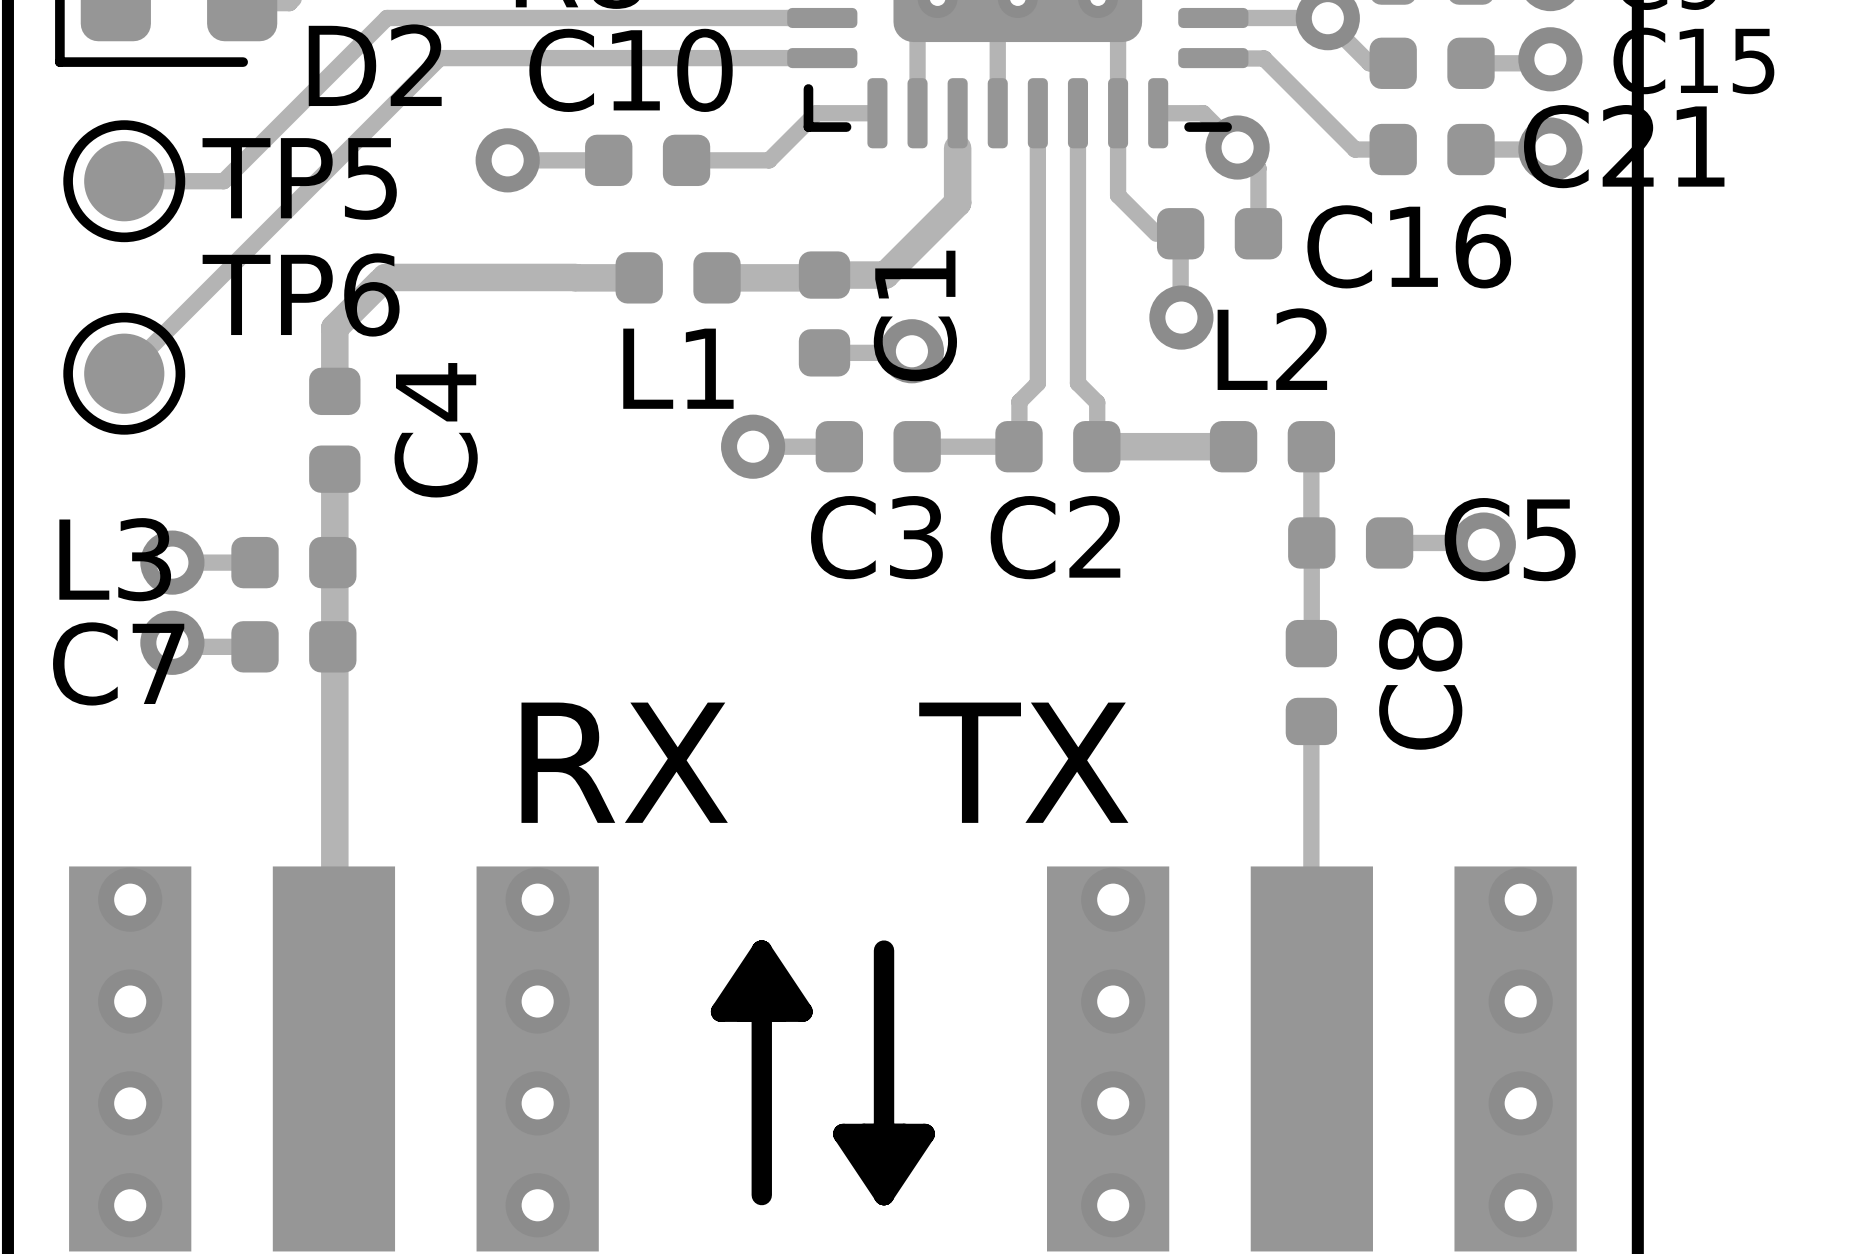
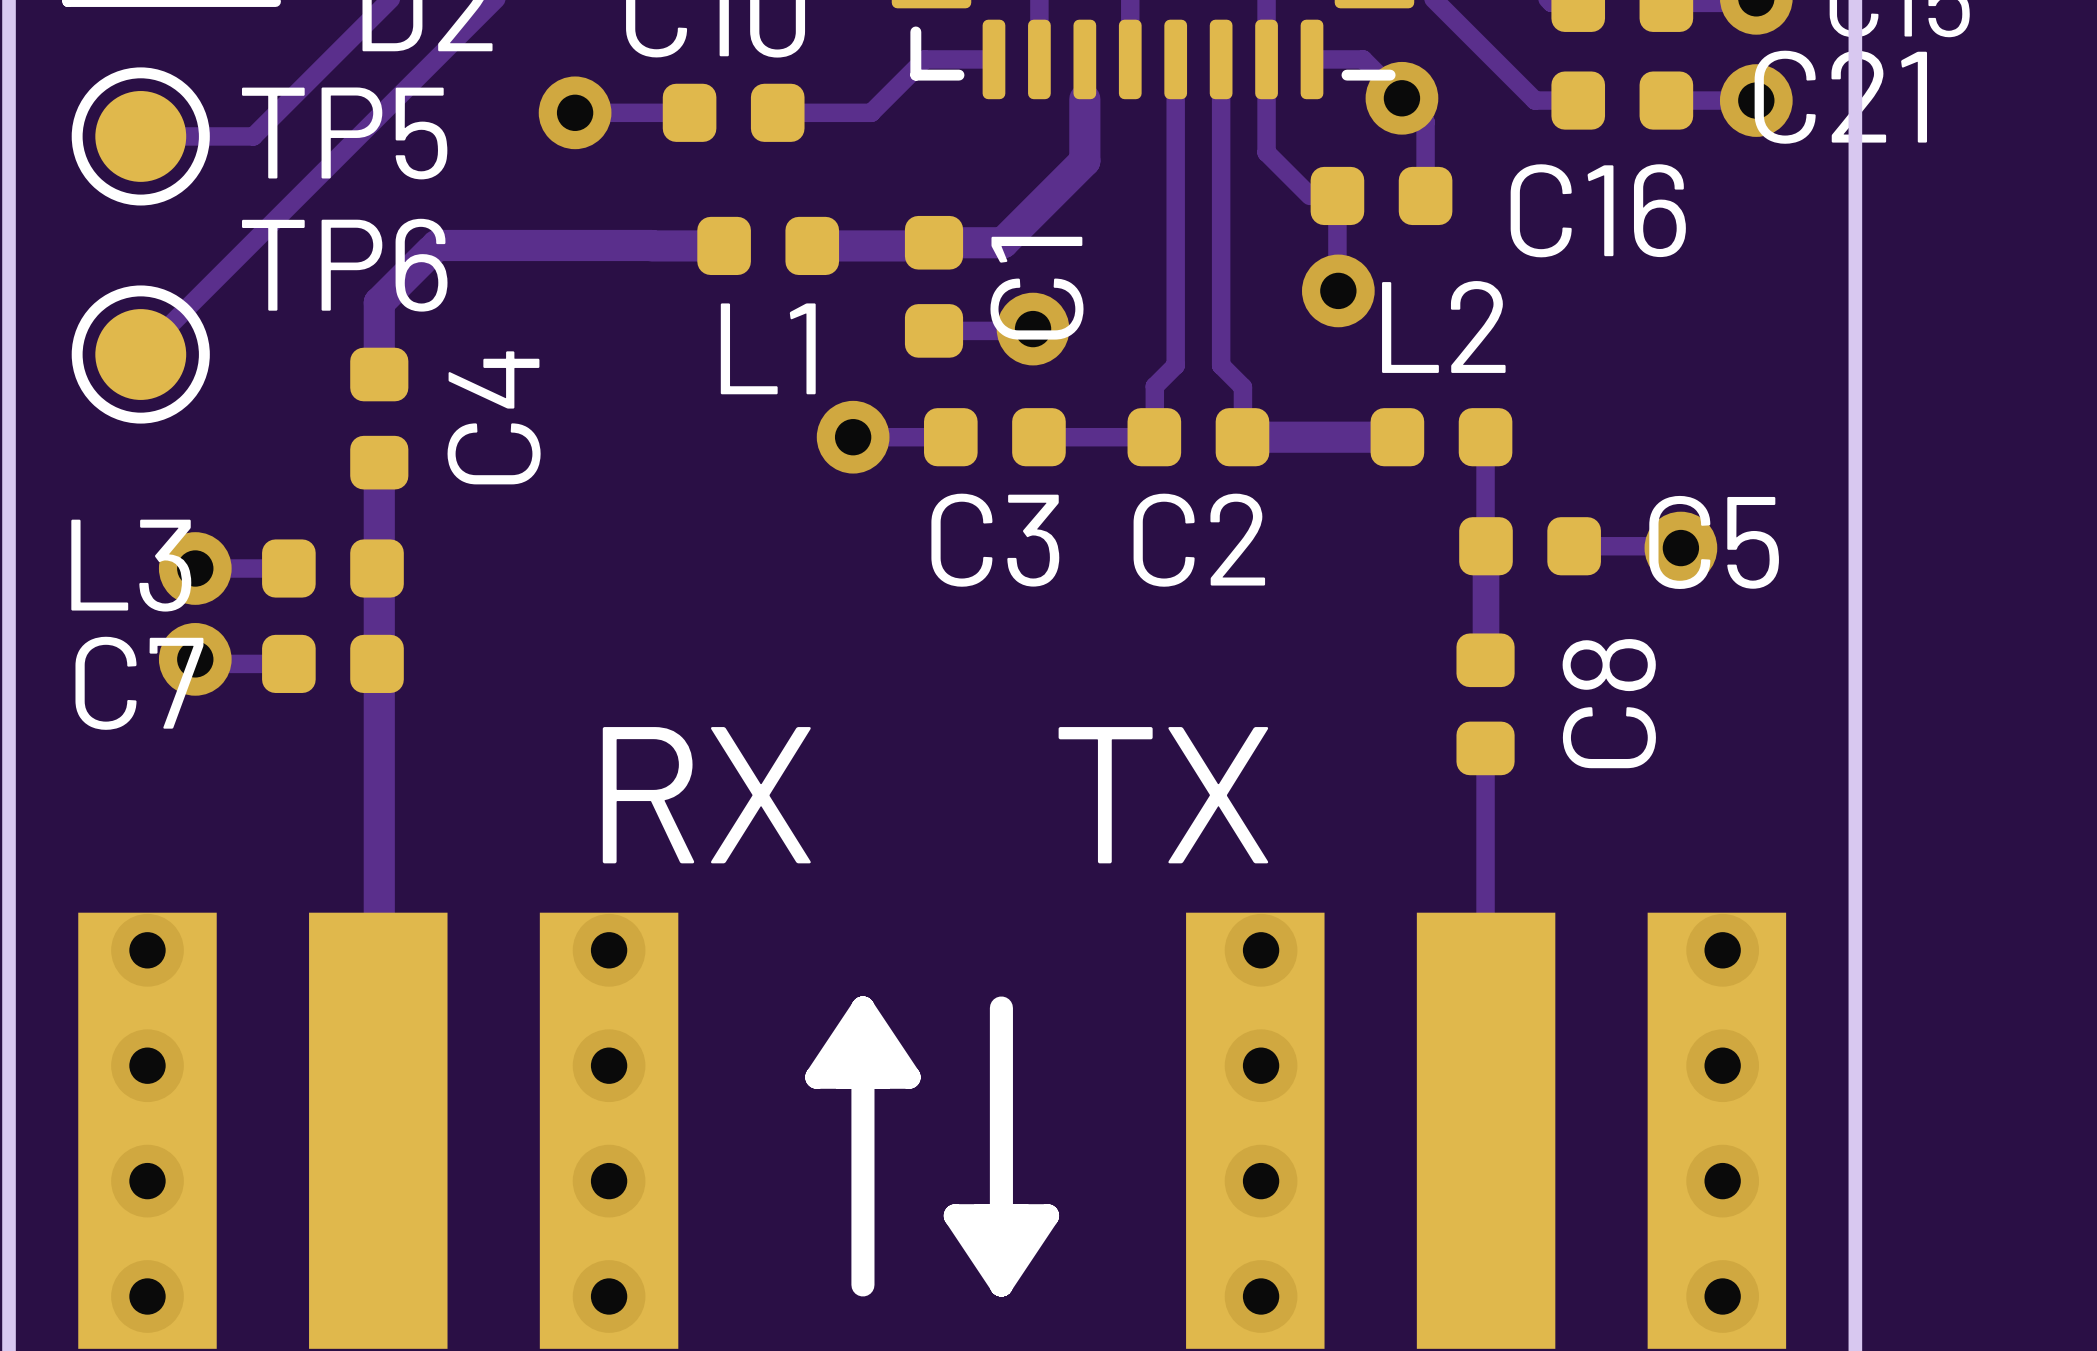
track width: thin (1311, 542) (1311, 643) -> thick (1486, 546) (1486, 659)

